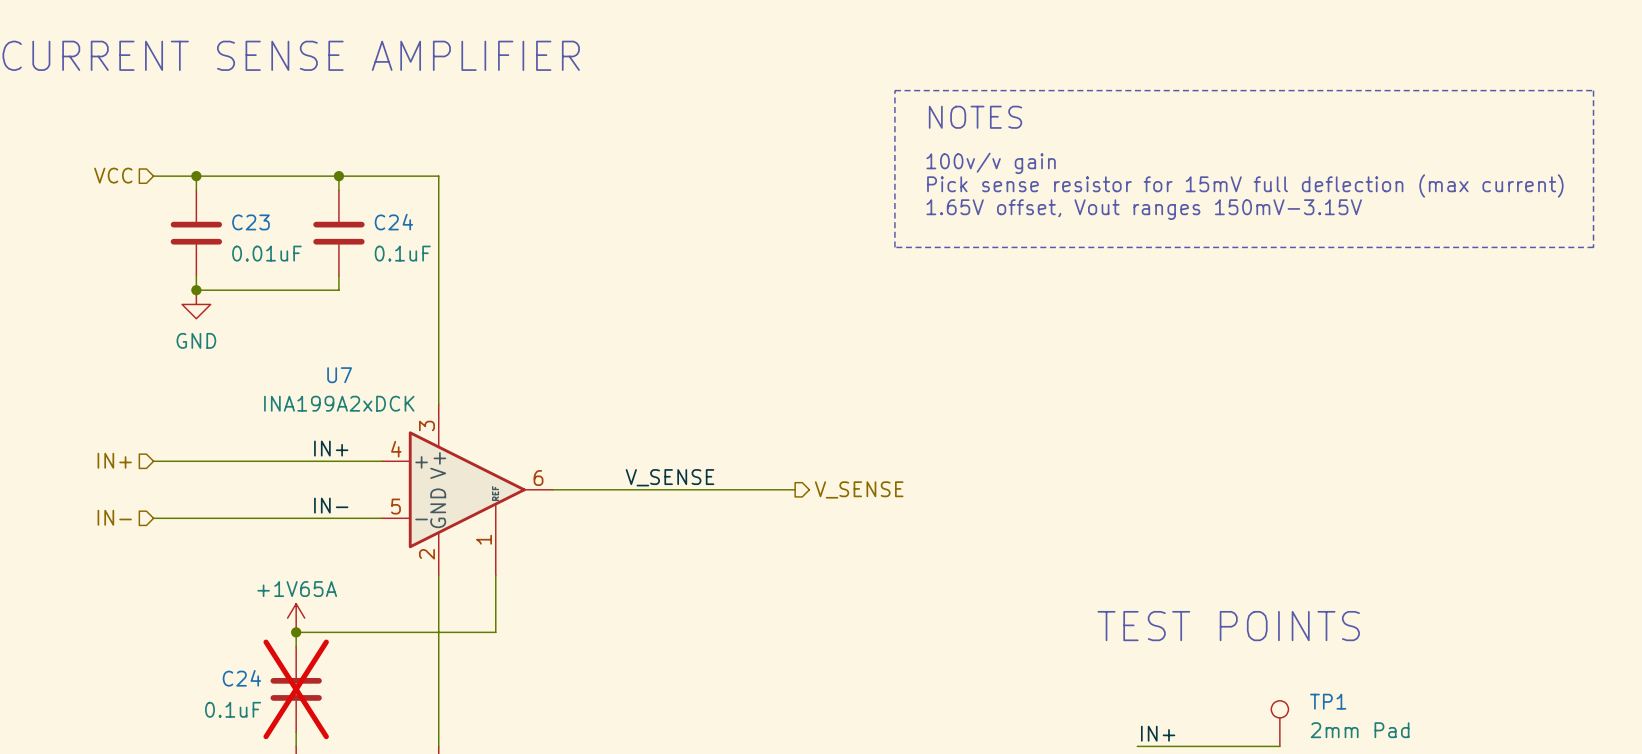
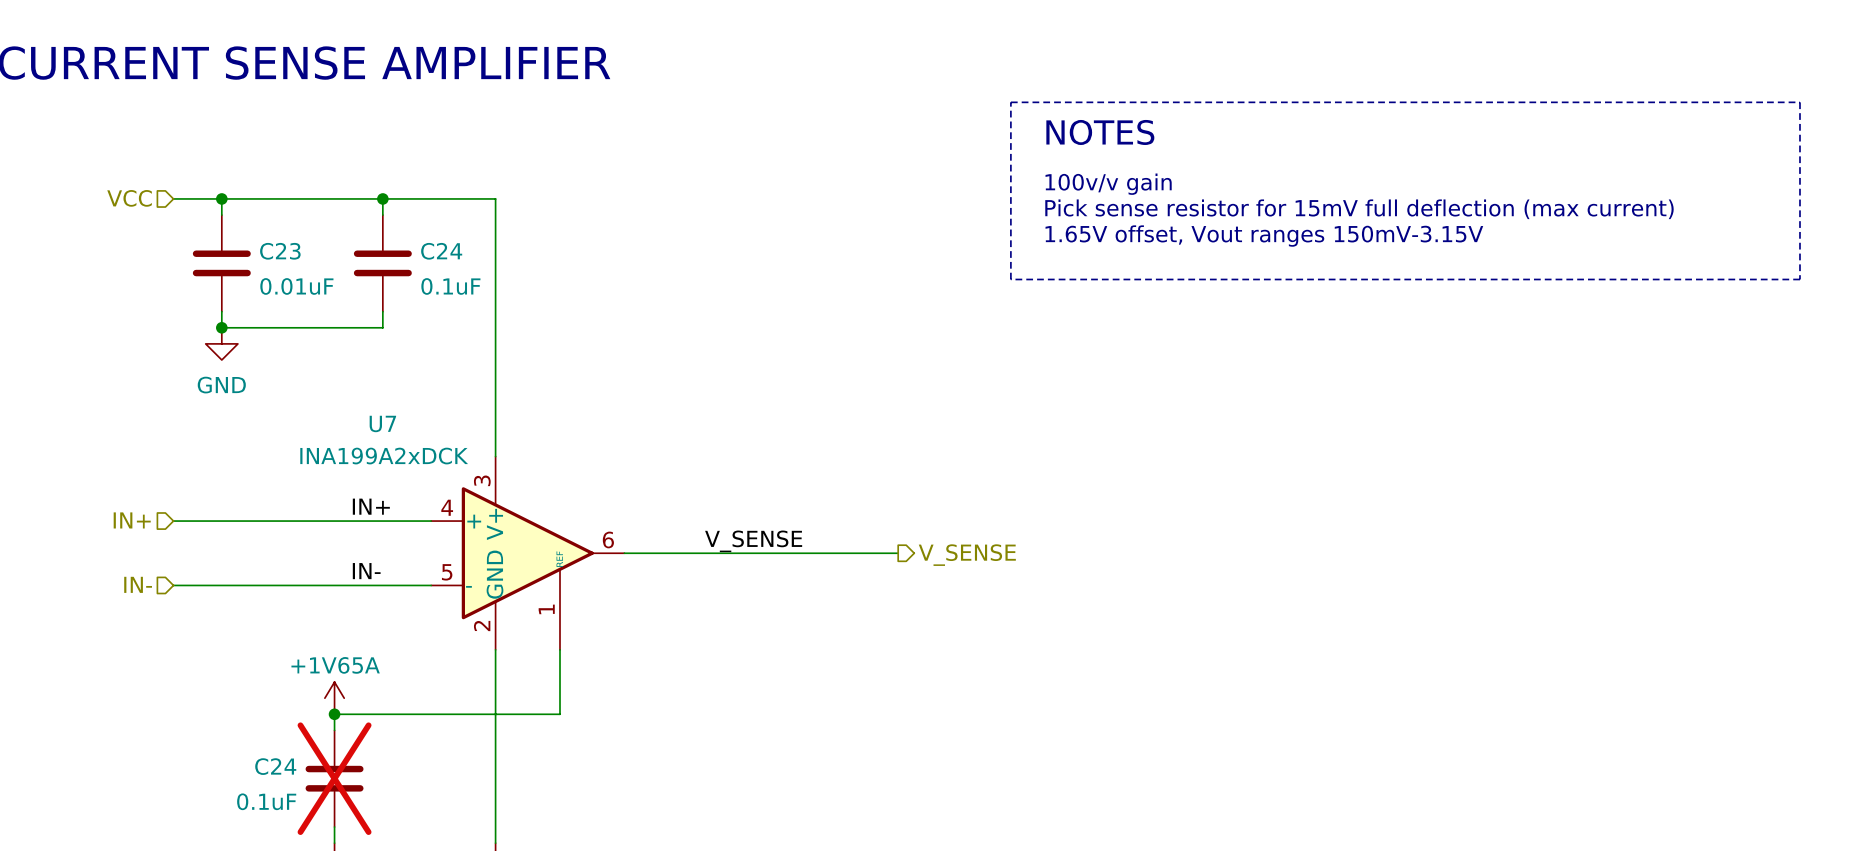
text: TEST POINTS (1228, 626) -> none
TP1: 2mm Pad (1279, 723) -> none
label: IN+ (1158, 733) -> none
wire: (1137, 746) (1279, 746) -> none

